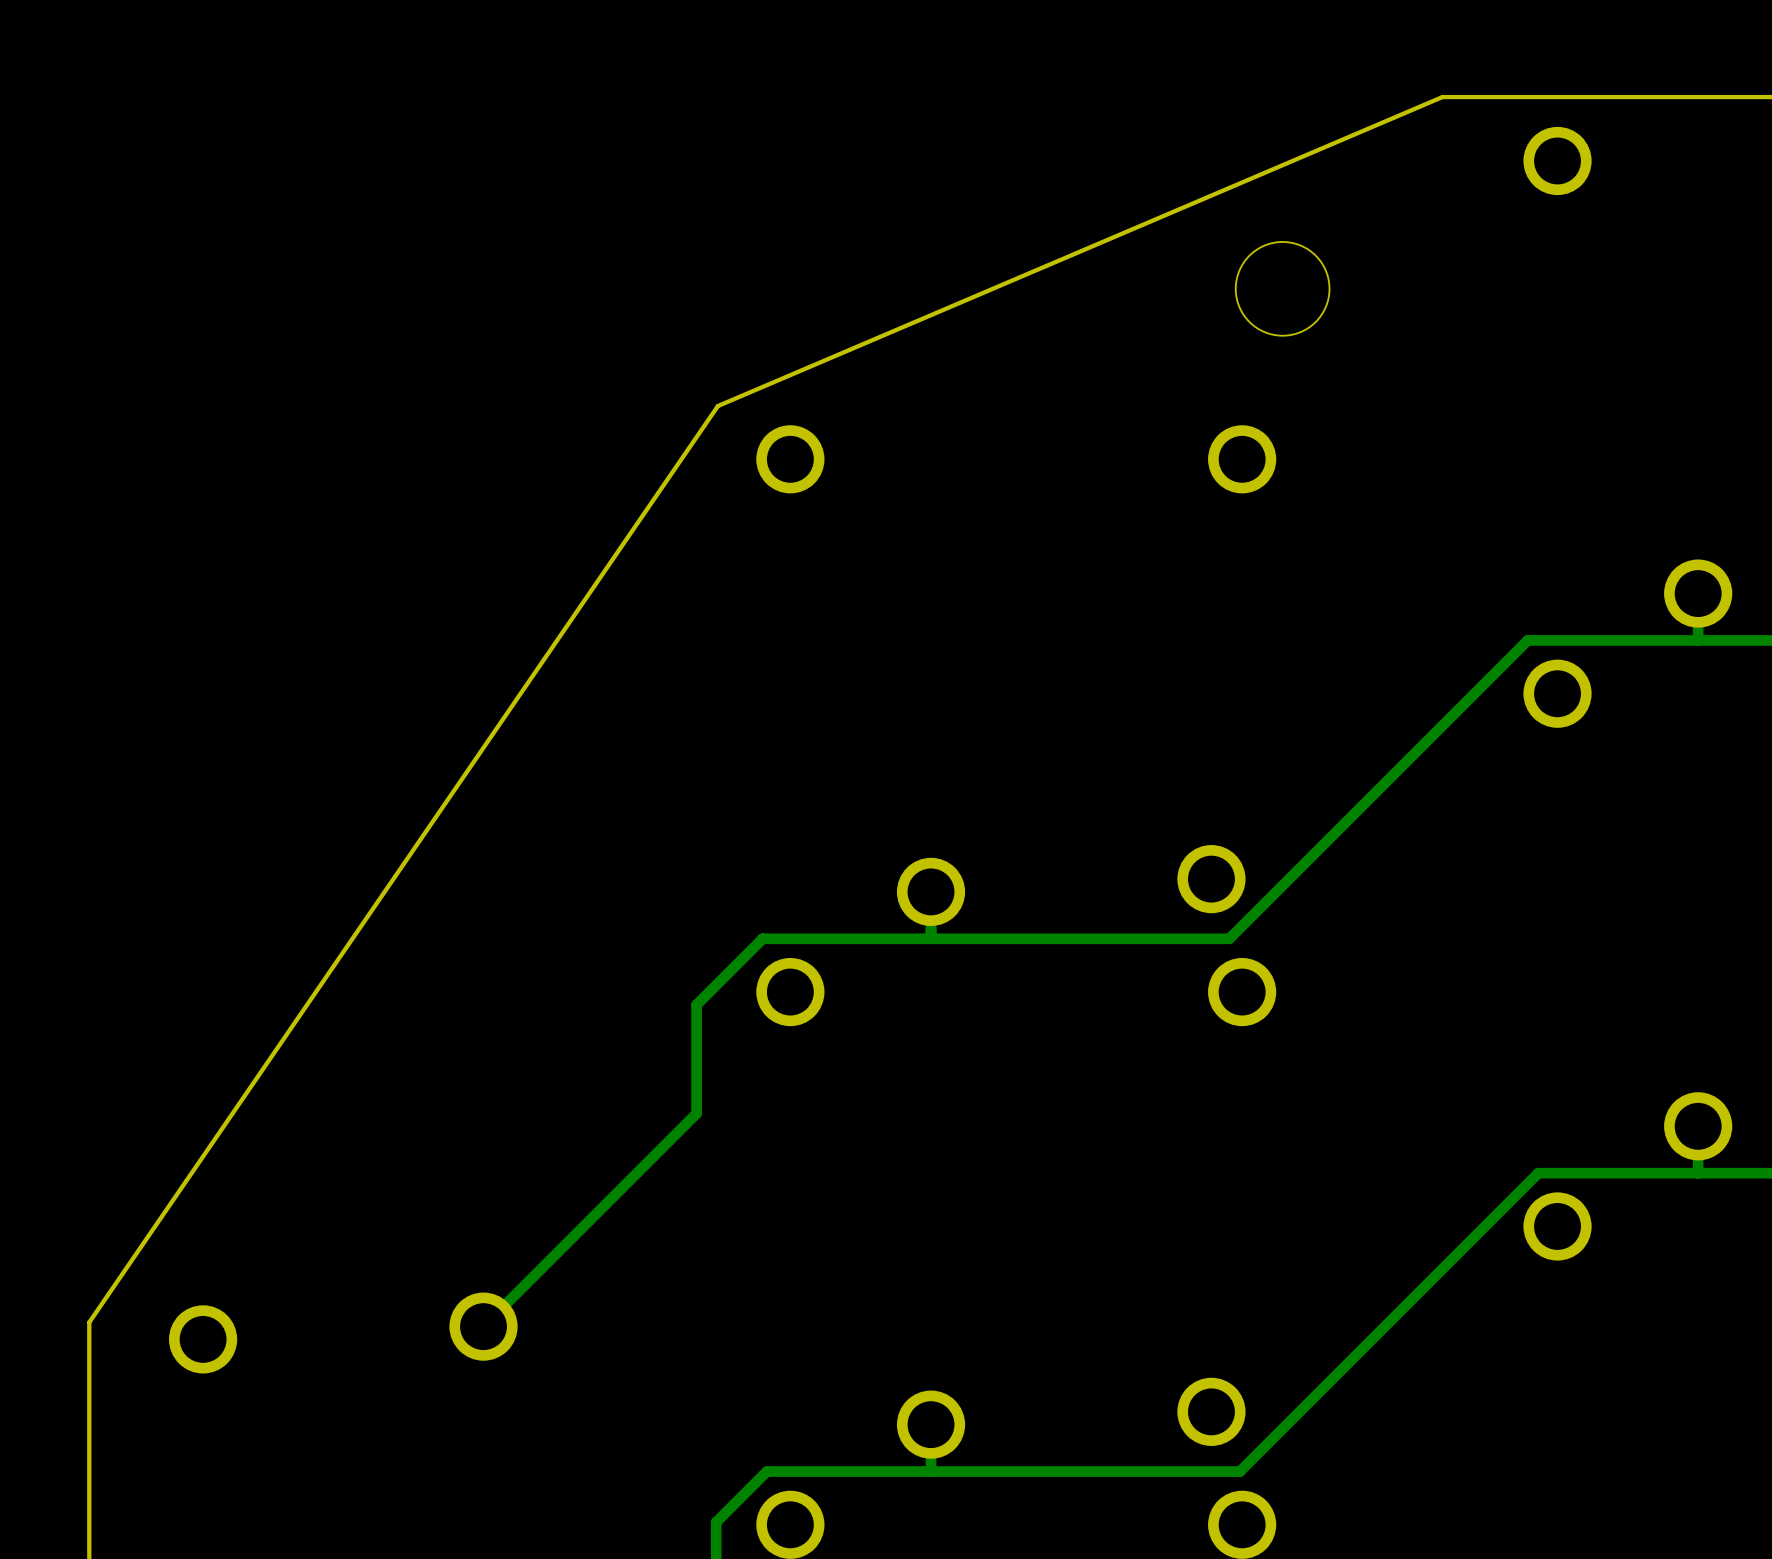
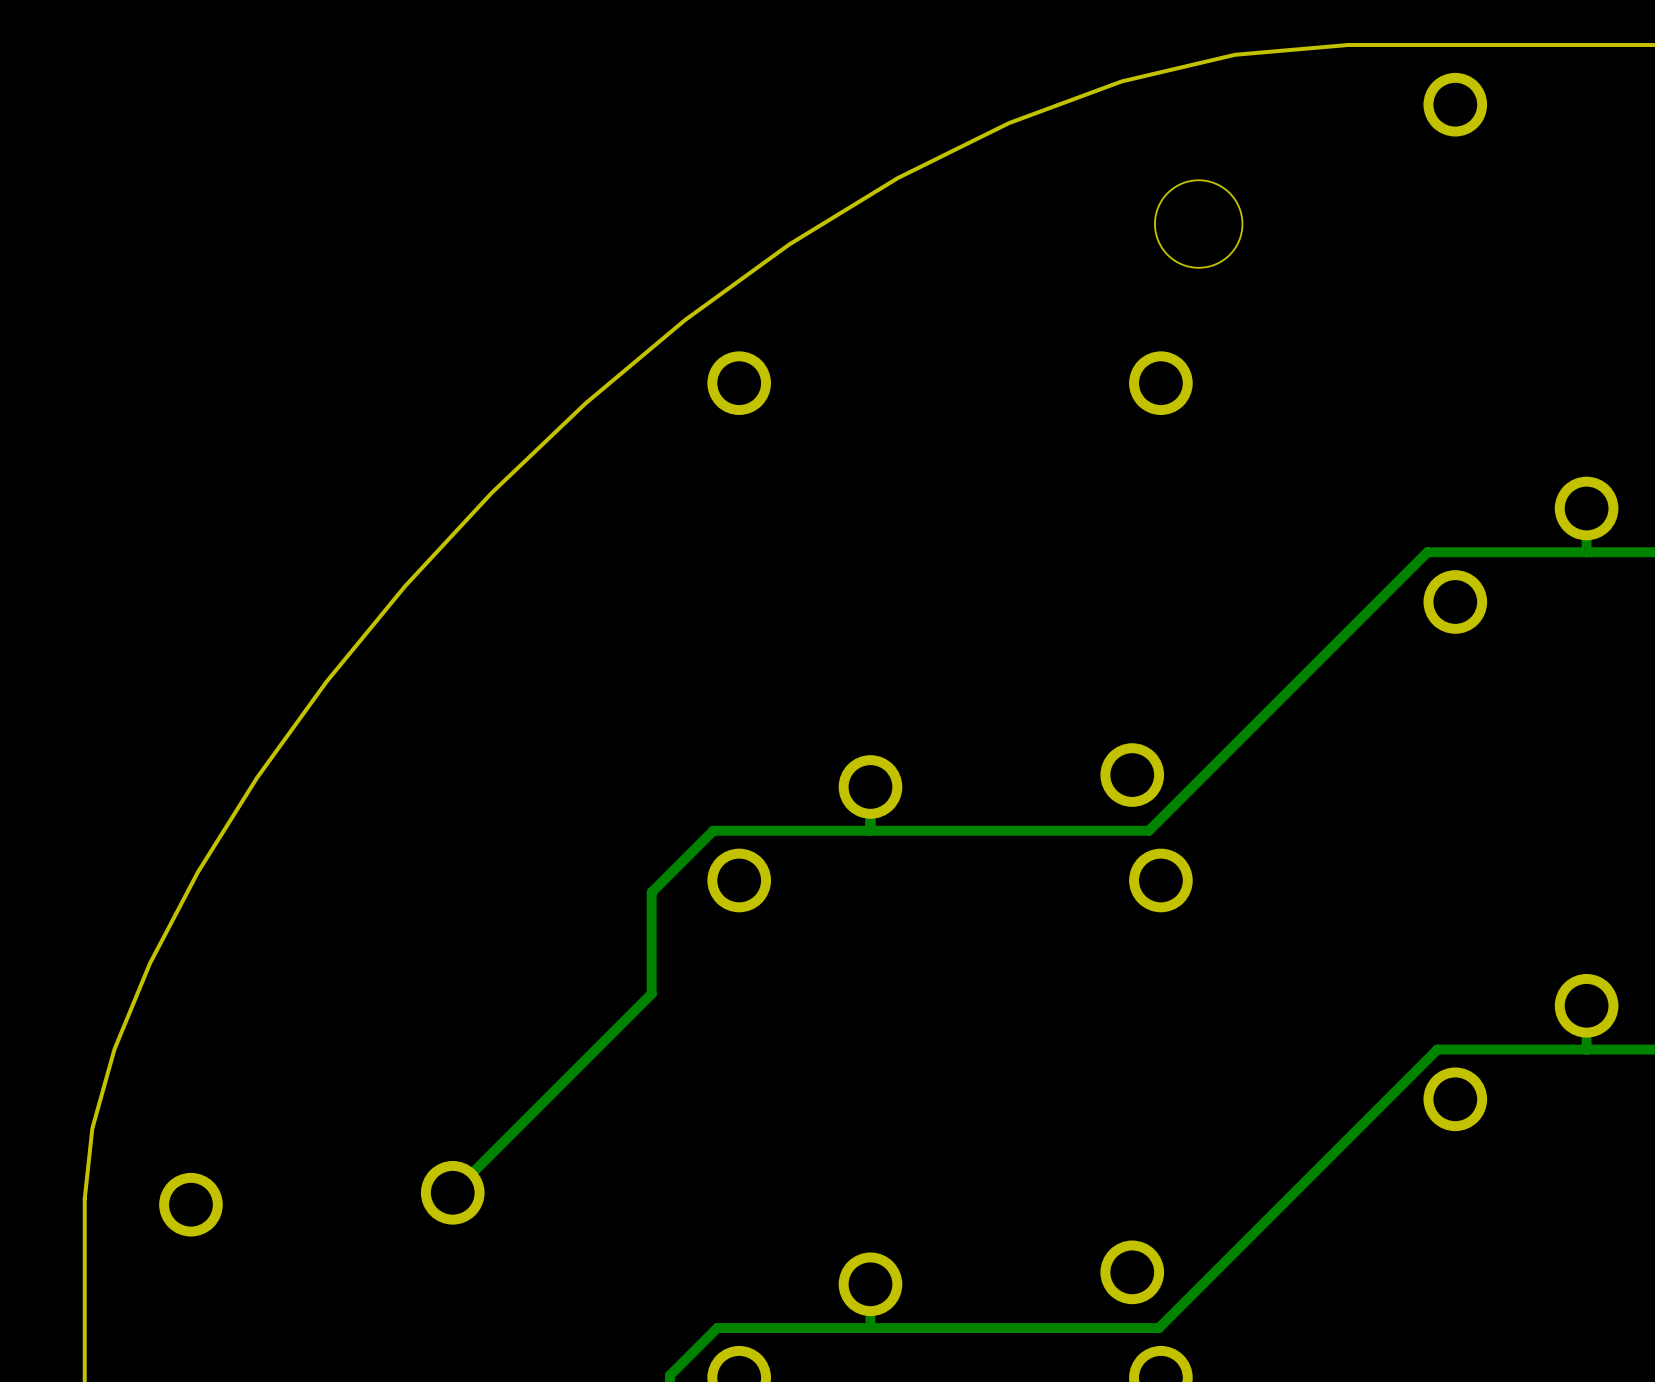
board edge: (1442, 97) (717, 406) (89, 1322) (89, 1333) -> (1347, 45) (1235, 54) (1121, 81) (1008, 123) (897, 178) (789, 244) (685, 320) (585, 403) (491, 492) (405, 586) (326, 681) (257, 777) (197, 872) (150, 963) (114, 1049) (92, 1128) (84, 1198)

